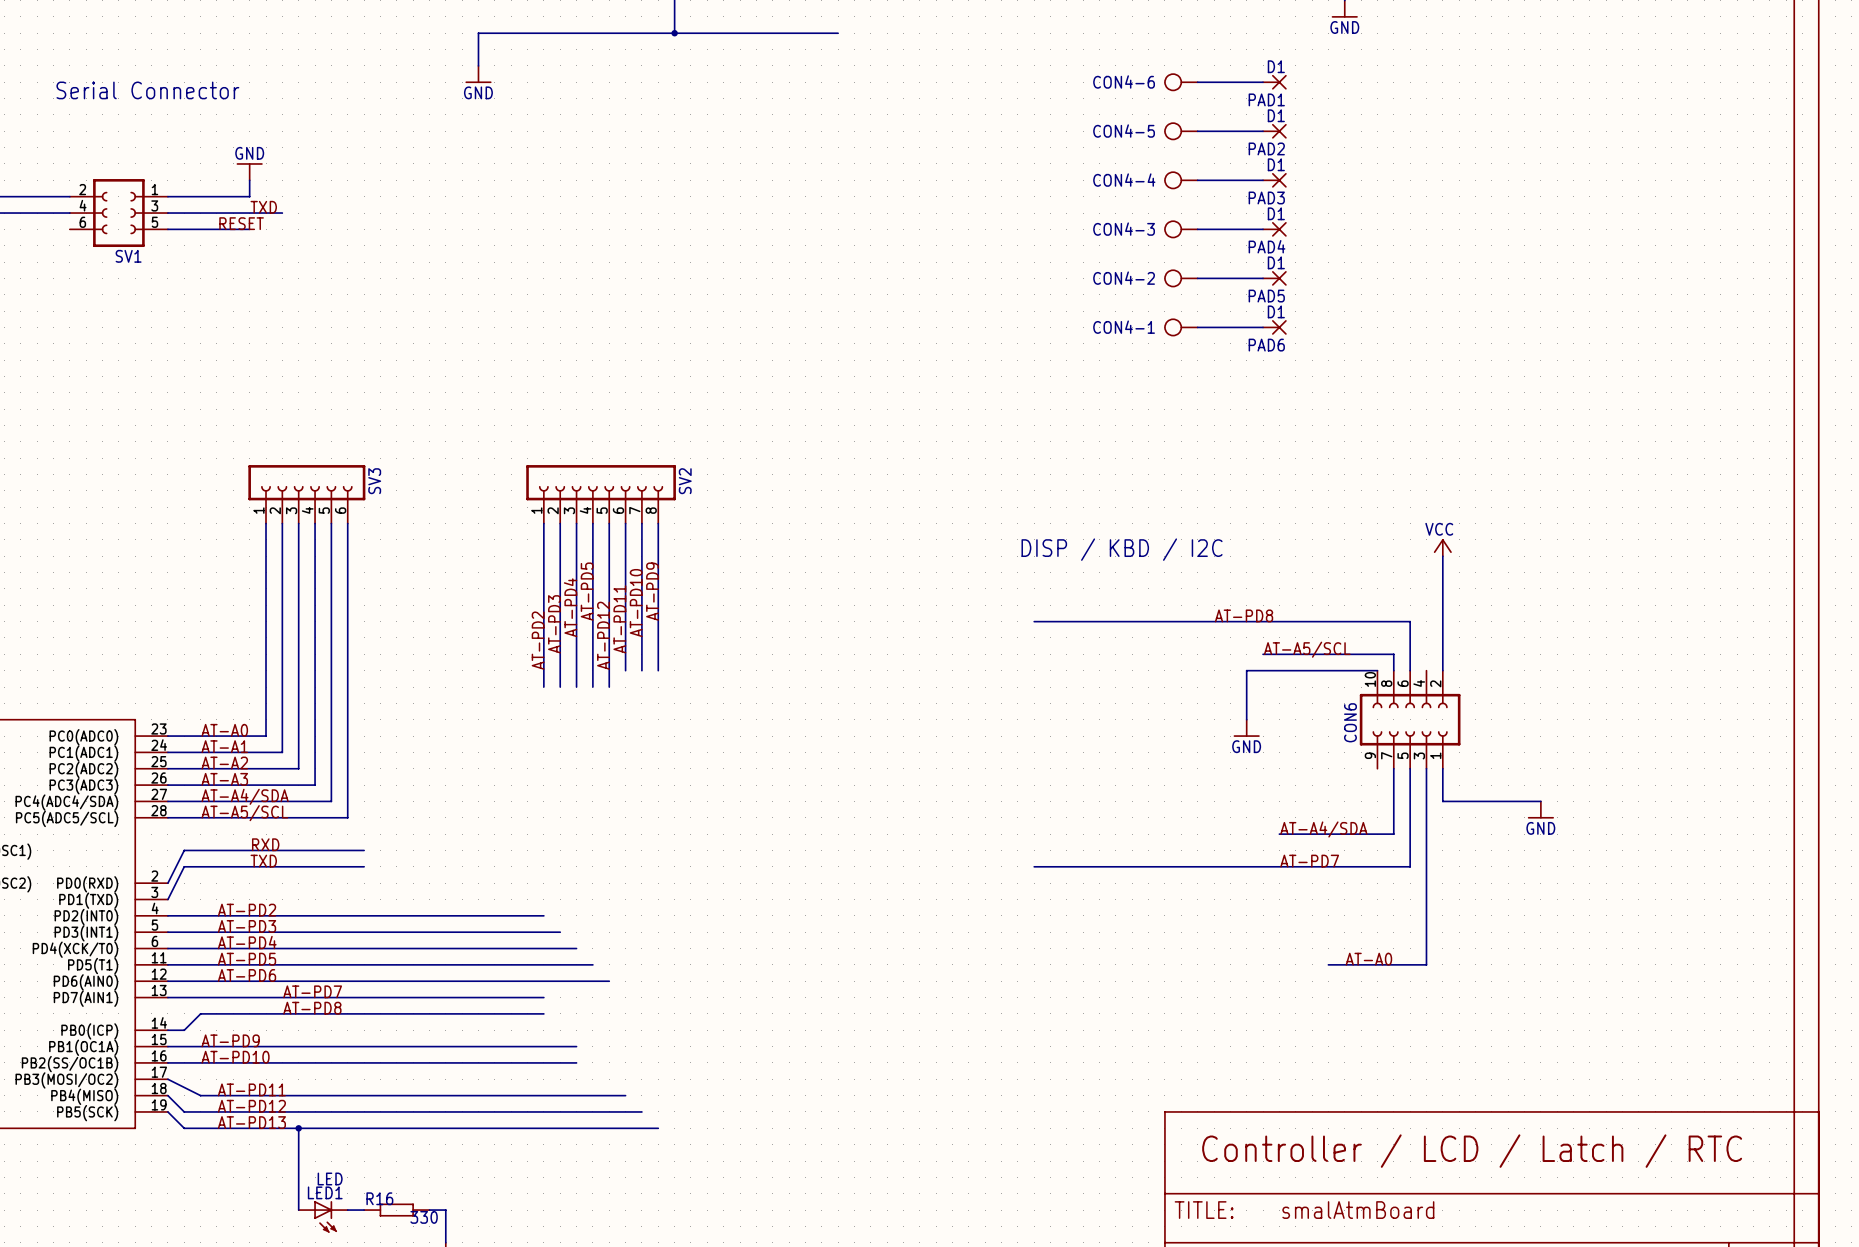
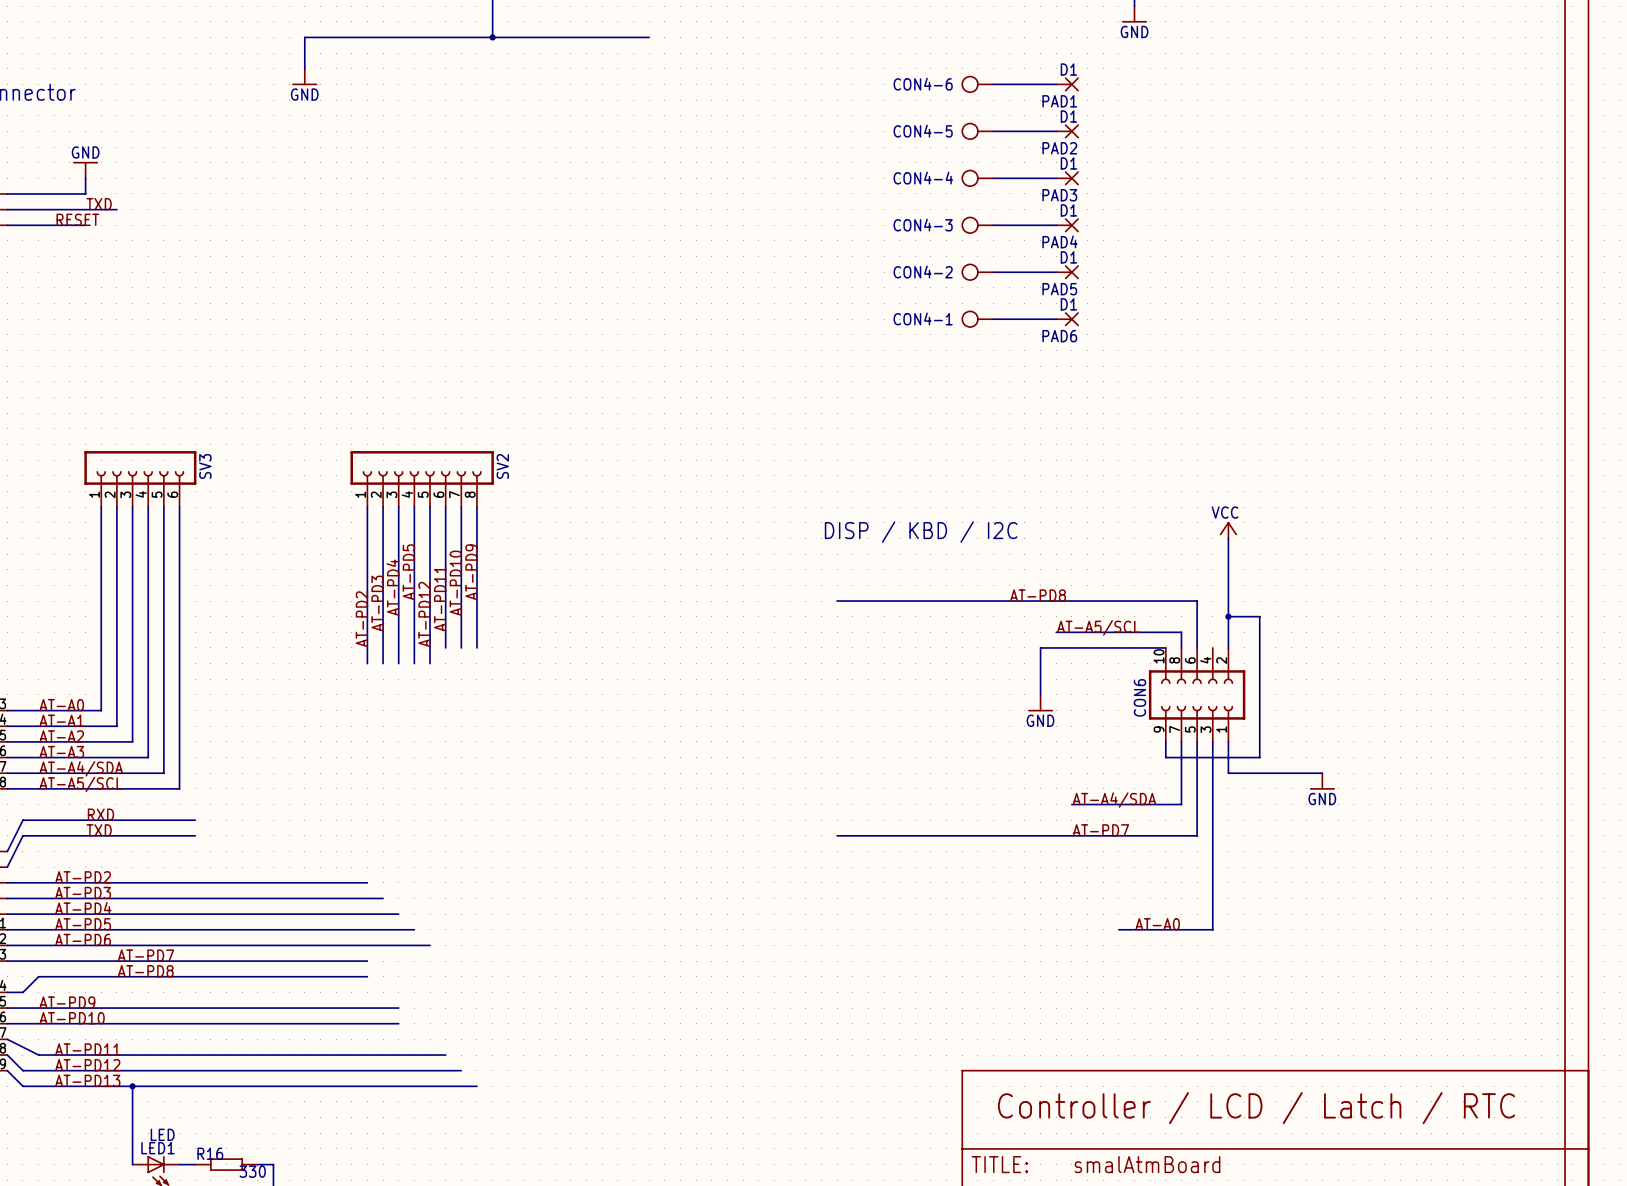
wire: none -> (1228, 616) (1259, 616) (1259, 757) (1165, 757) (1165, 741)
junction: none -> (1228, 616)

